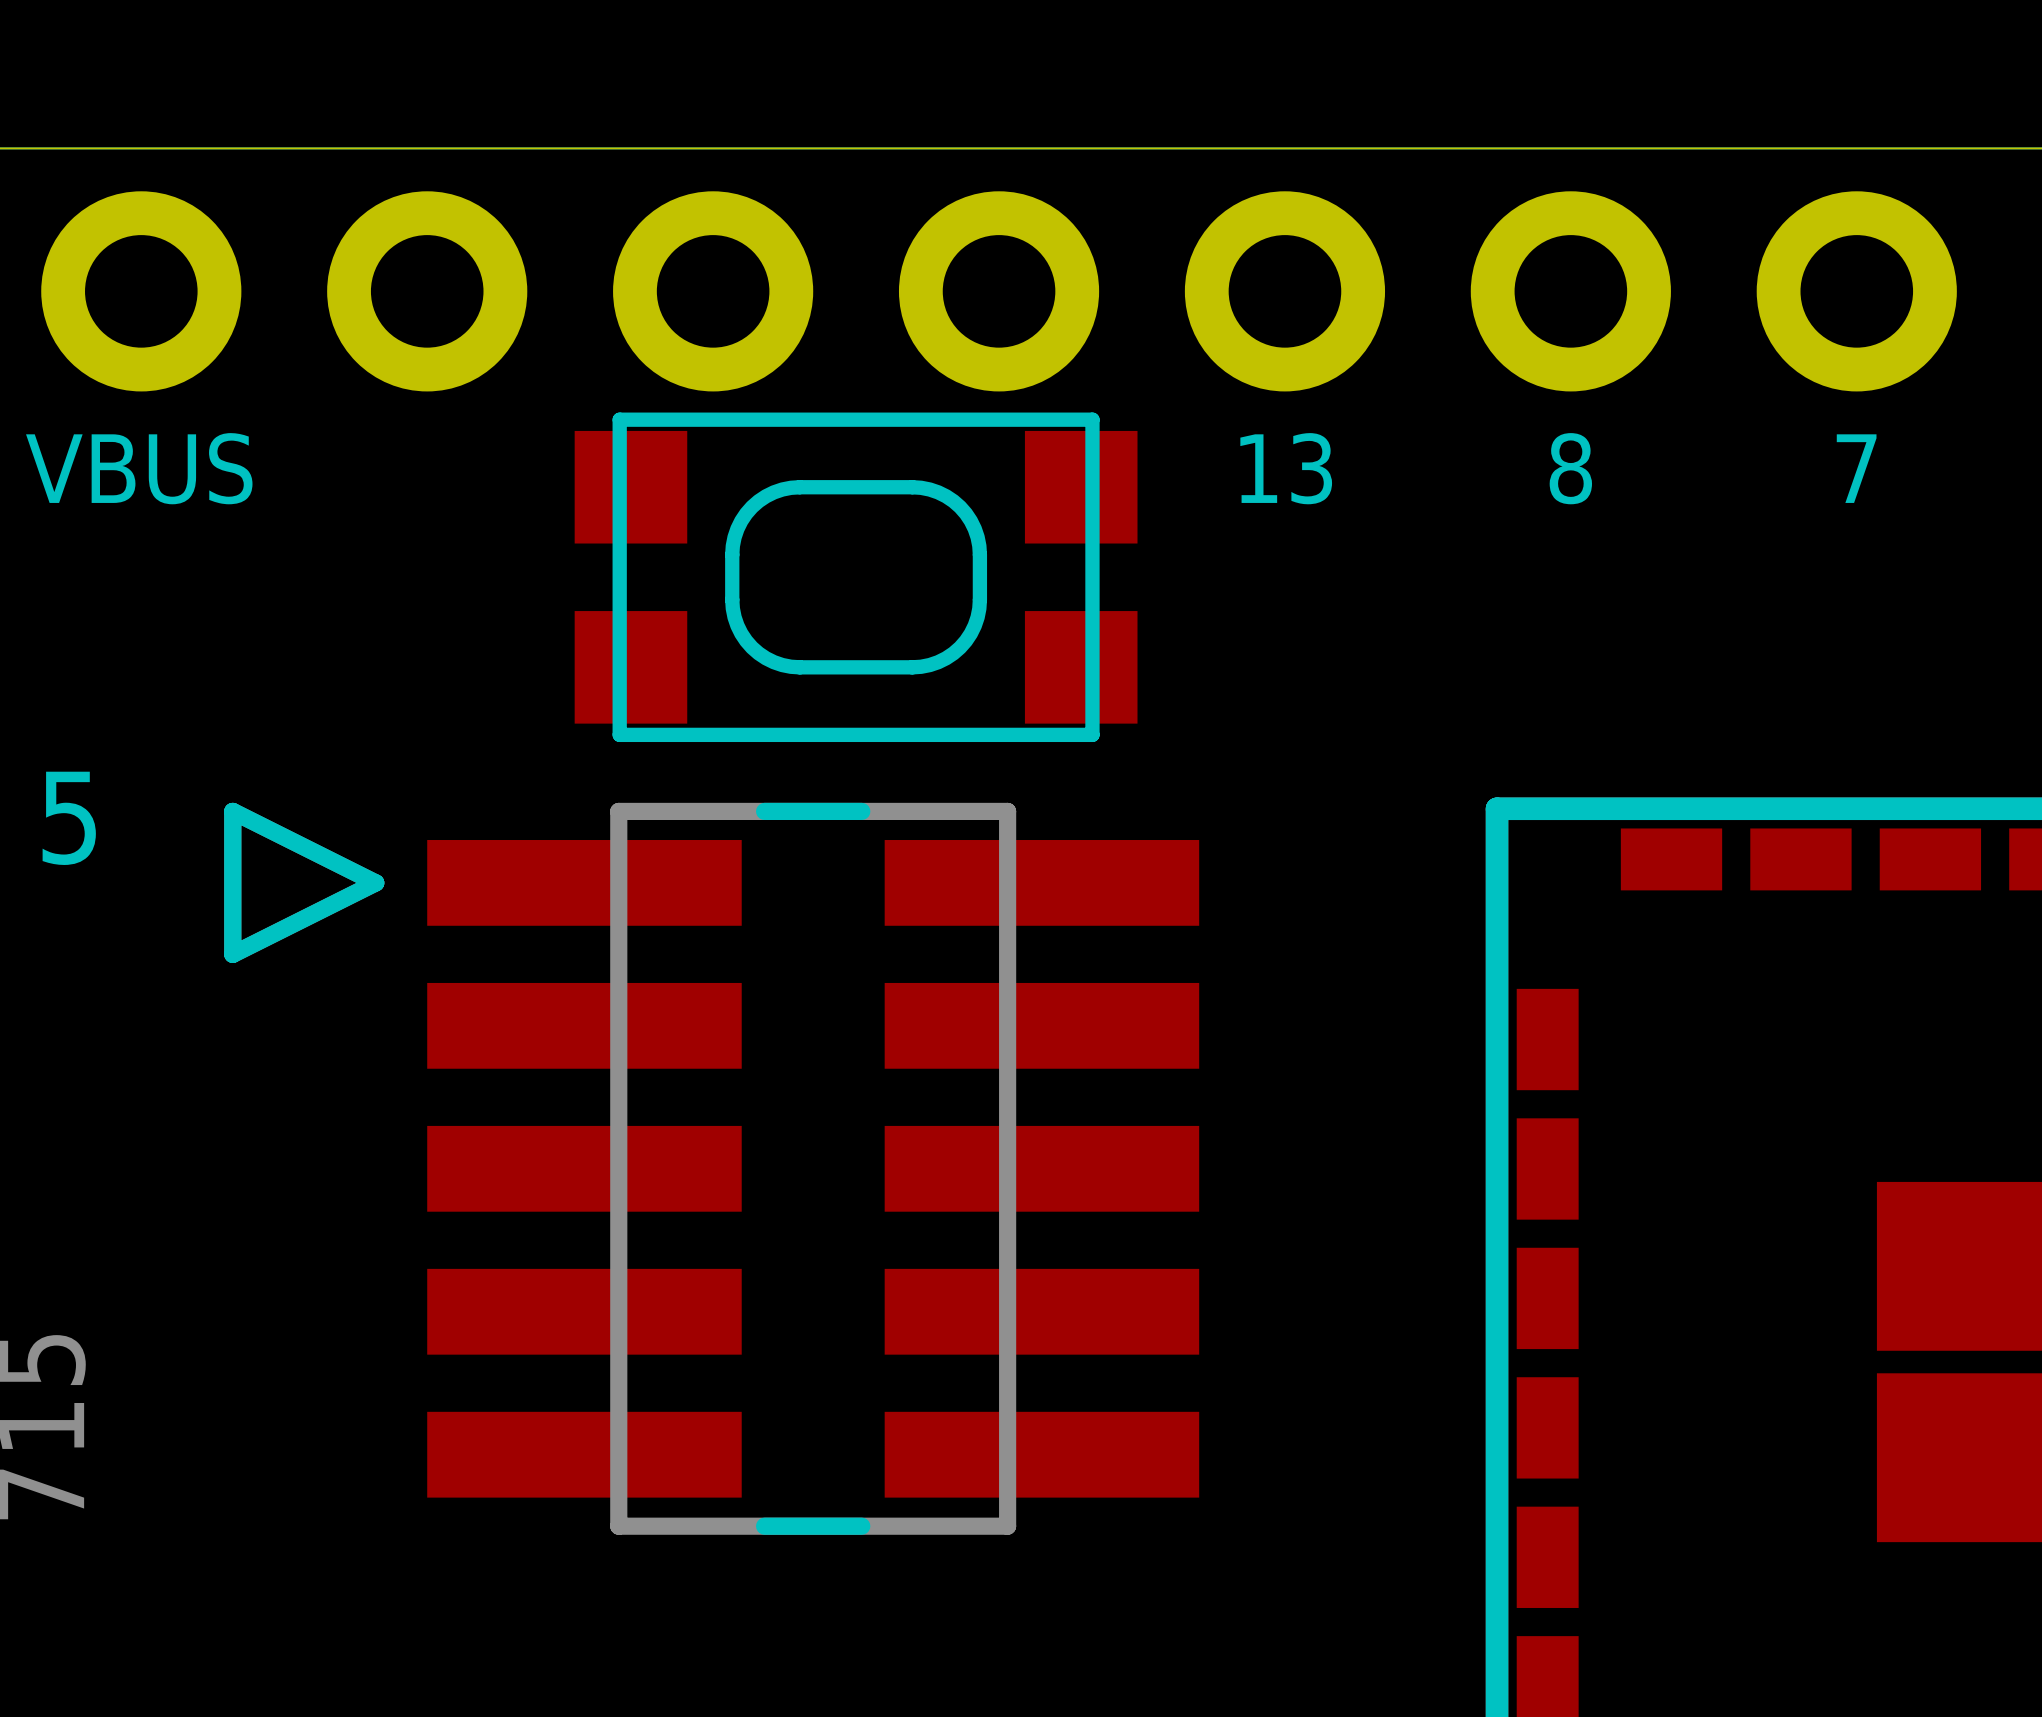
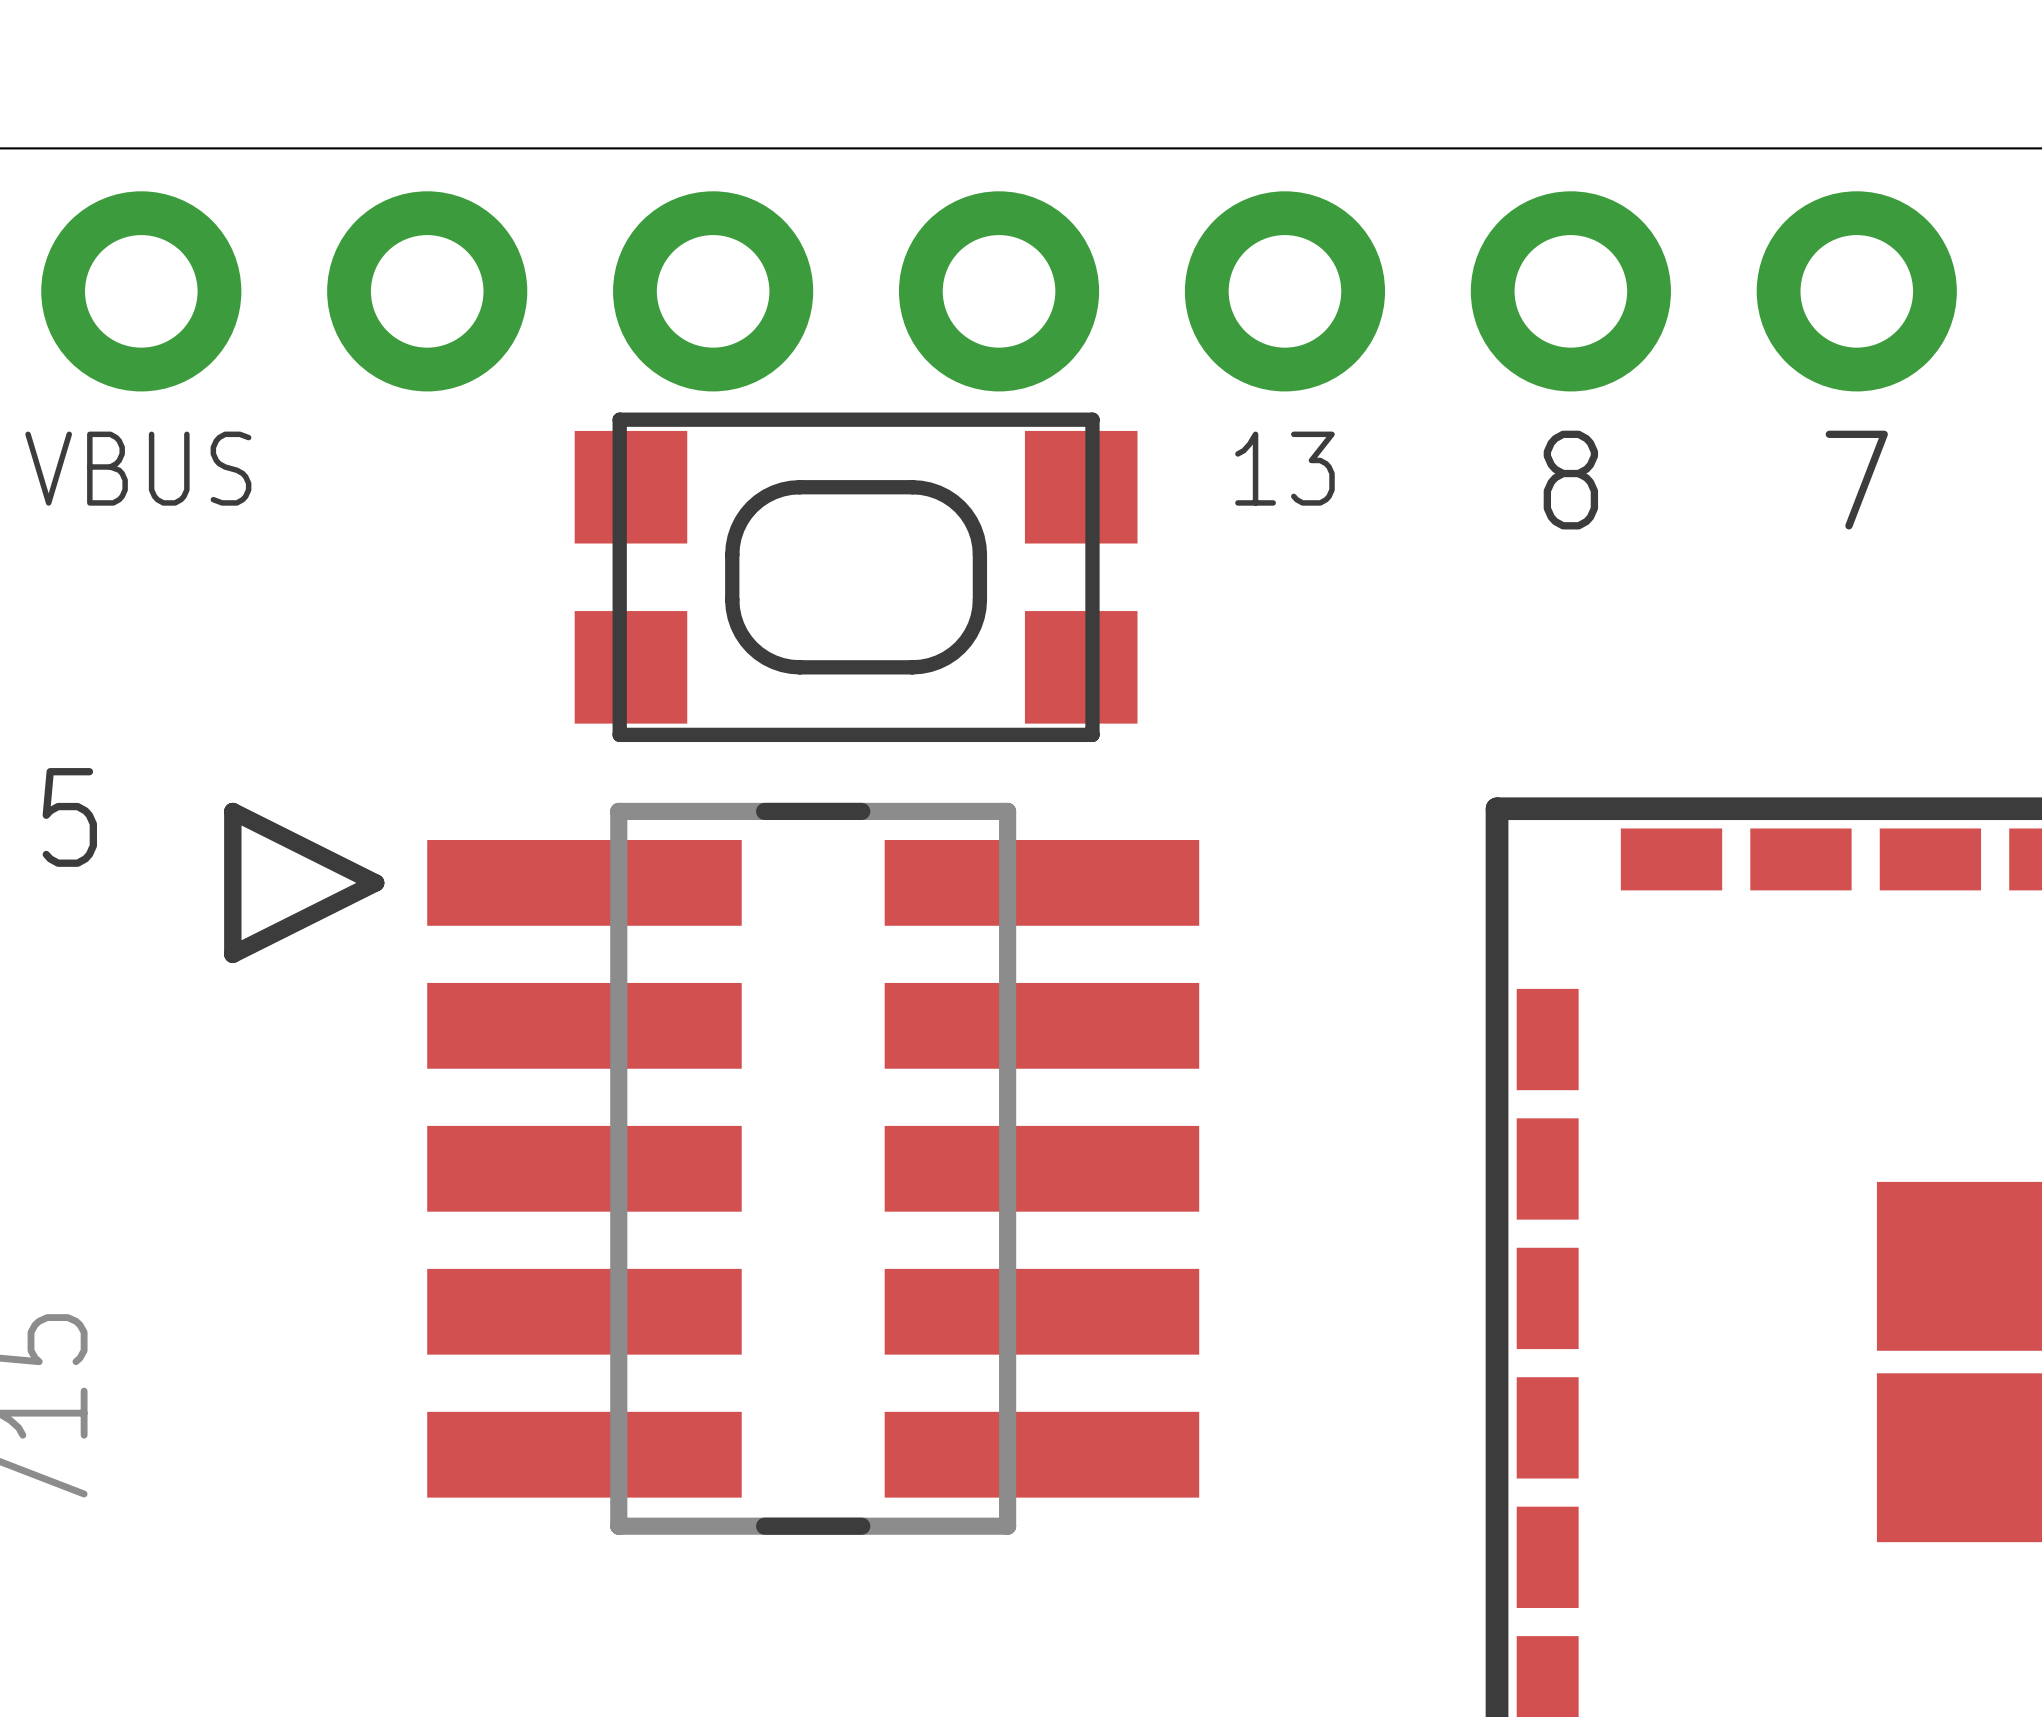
text position: 8 (1570, 468) -> 8 (1570, 480)
text position: 7 (1856, 468) -> 7 (1856, 480)

